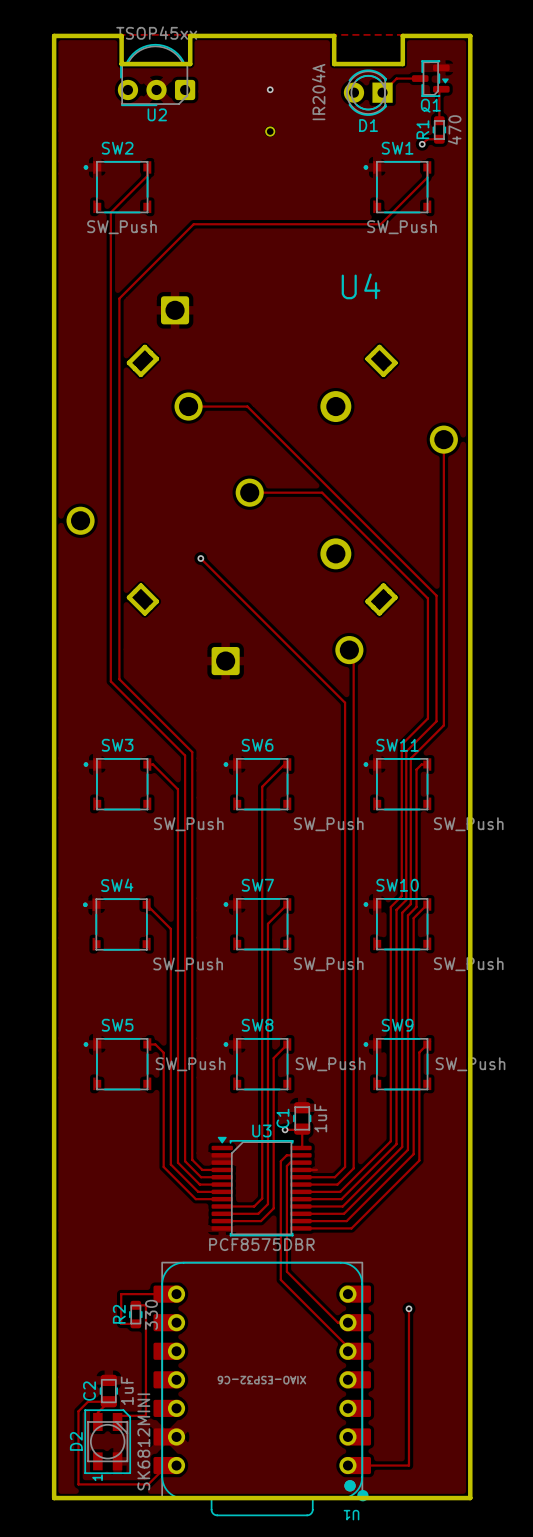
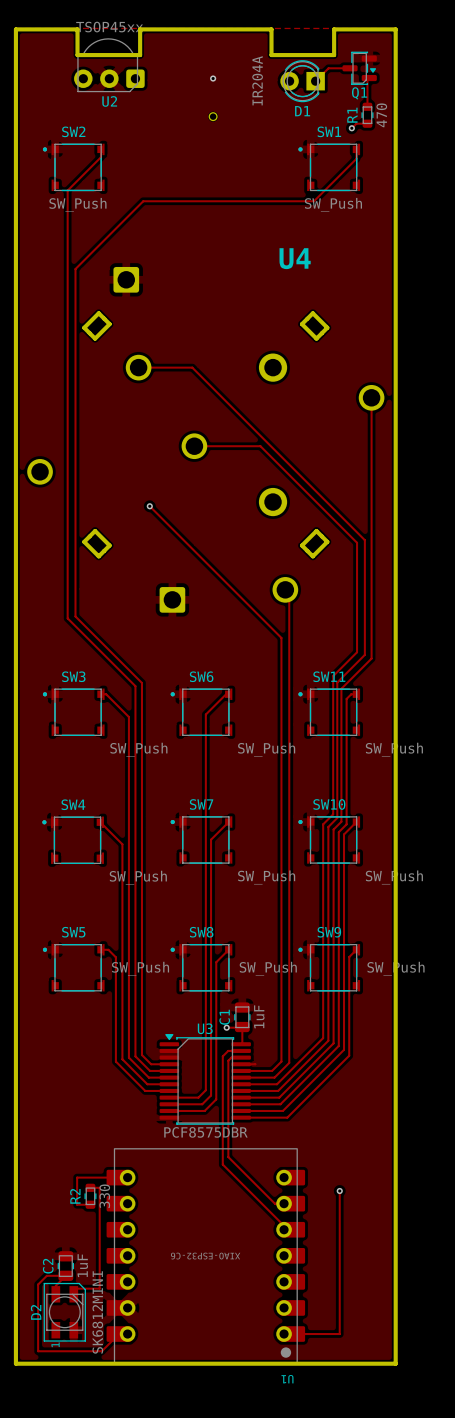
U2 footprint: [117, 44, 196, 106] -> [74, 38, 145, 93]
U1 footprint: [153, 1261, 372, 1517] -> [106, 1148, 306, 1365]

